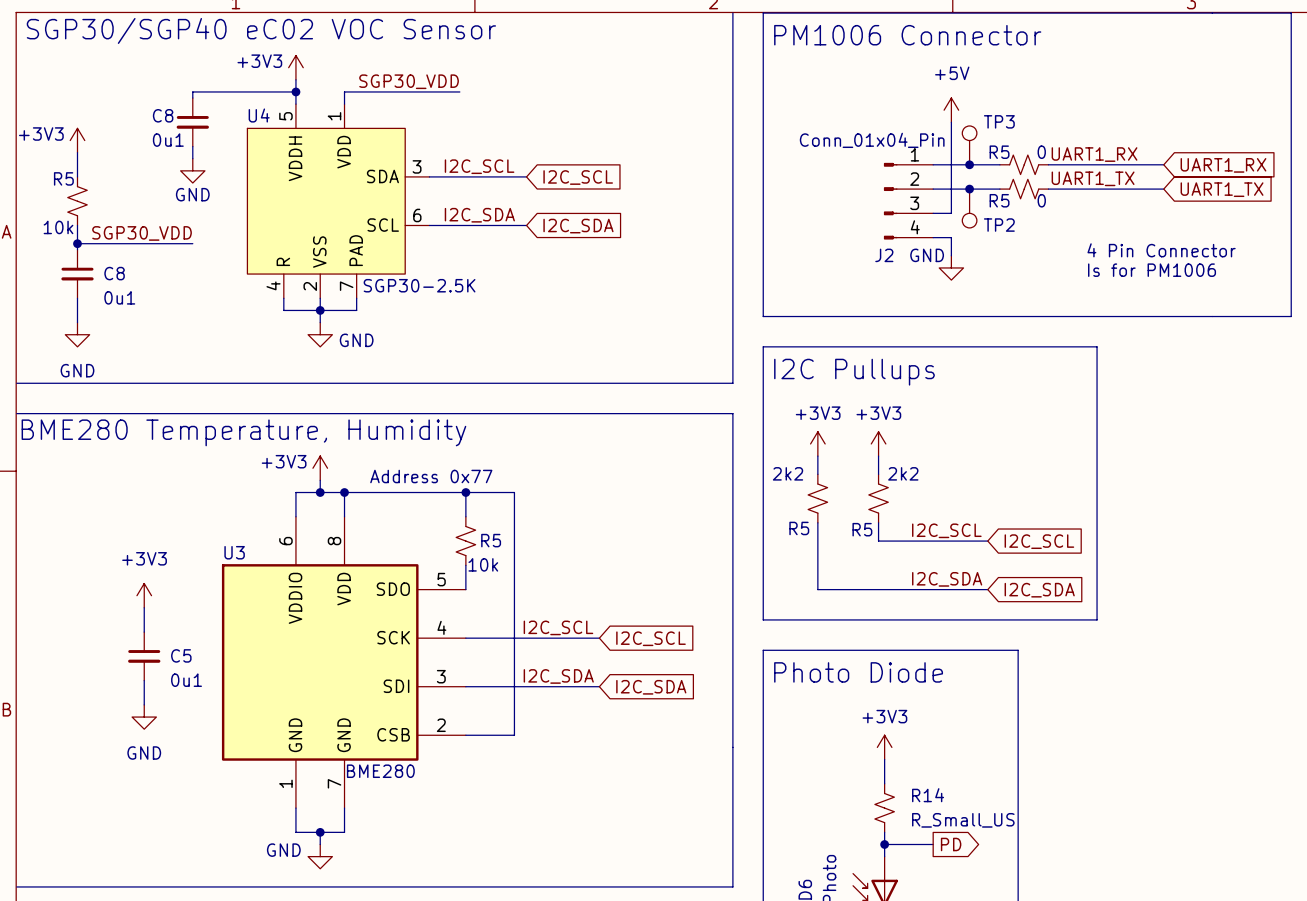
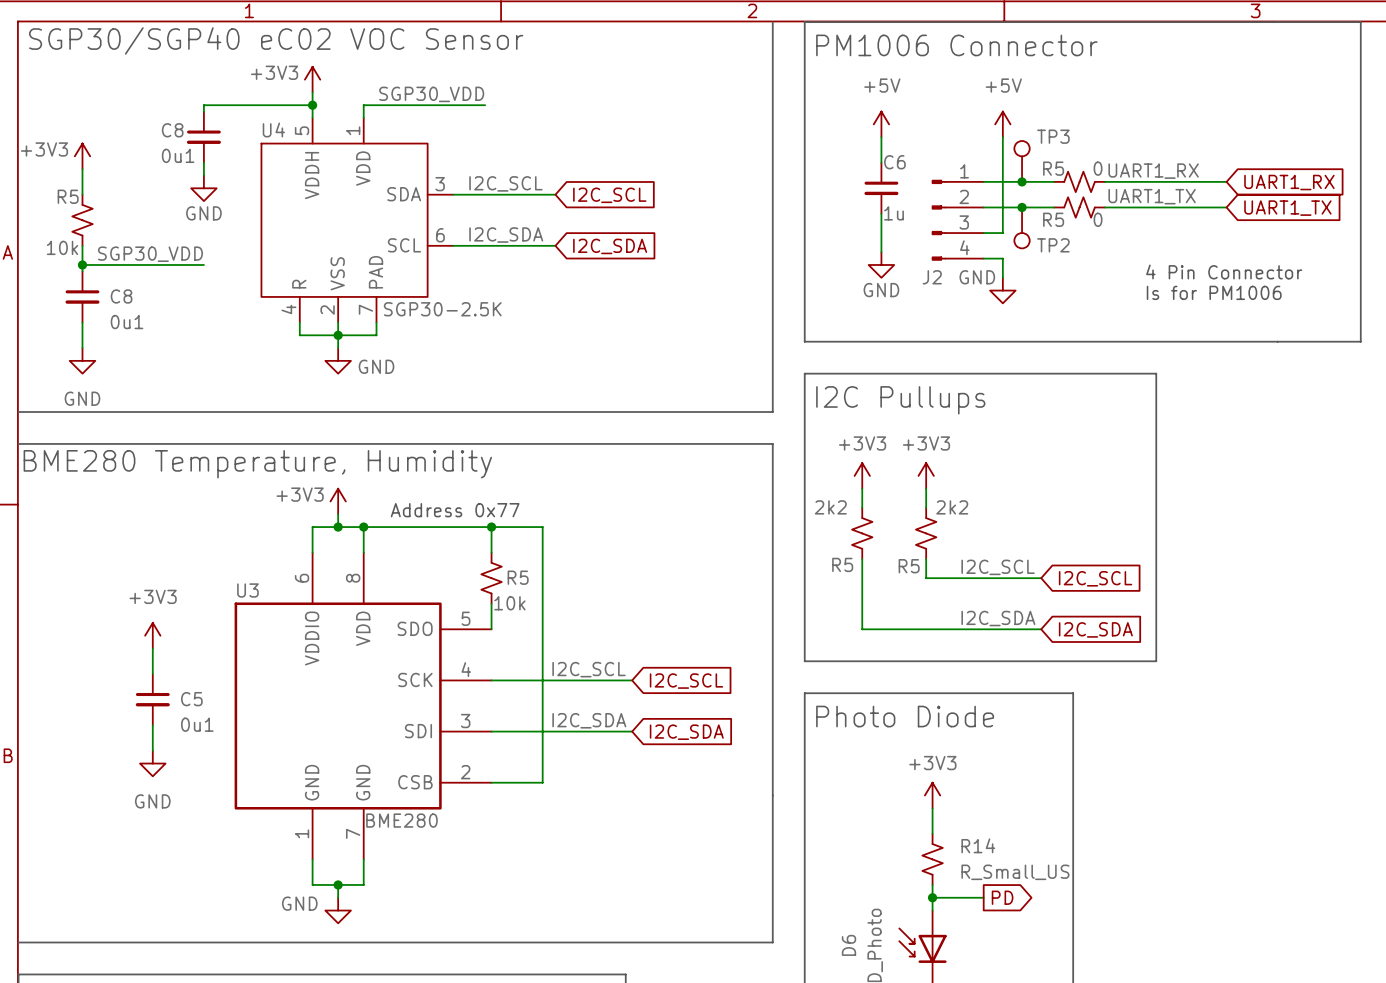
power symbol: none -> +5V (881, 124)
wire: none -> (881, 137) (881, 162)
J2 value: Conn_01x04_Pin (872, 140) -> none
C6: none -> 1u (881, 188)
wire: none -> (881, 213) (881, 252)
power symbol: none -> GND (881, 265)

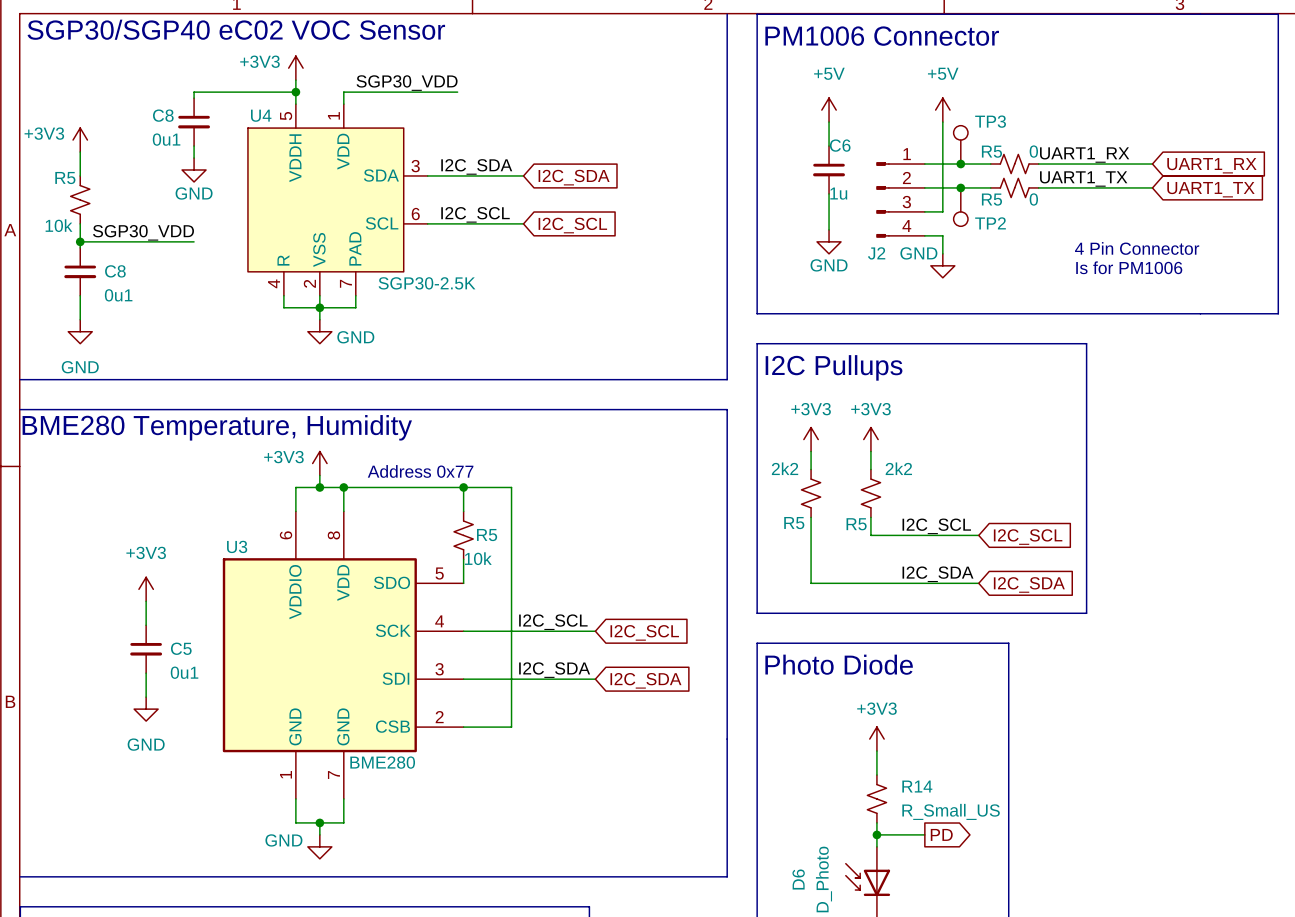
label: I2C_SCL (505, 183) -> I2C_SDA (476, 166)
global label: I2C_SCL (609, 195) -> I2C_SDA (574, 177)
label: I2C_SDA (506, 235) -> I2C_SCL (475, 214)
global label: I2C_SDA (610, 246) -> I2C_SCL (572, 225)

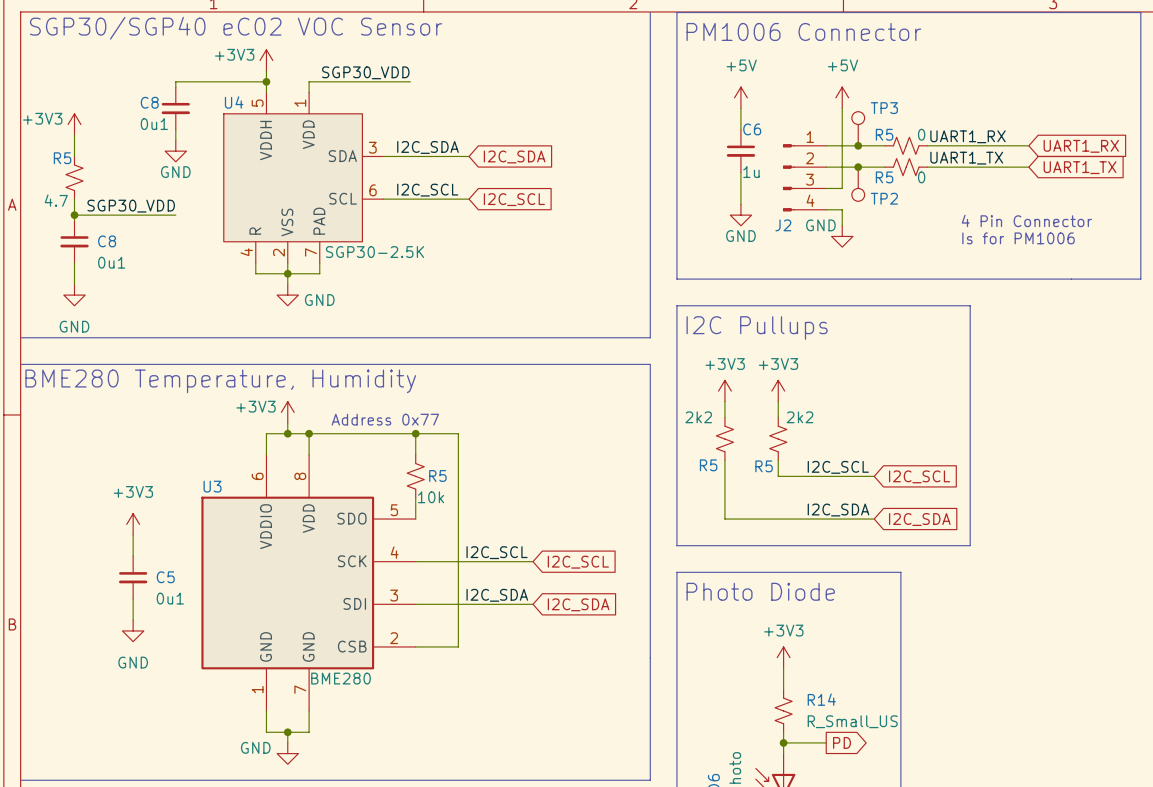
R5 value: 10k (59, 225) -> 4.7 (56, 200)

